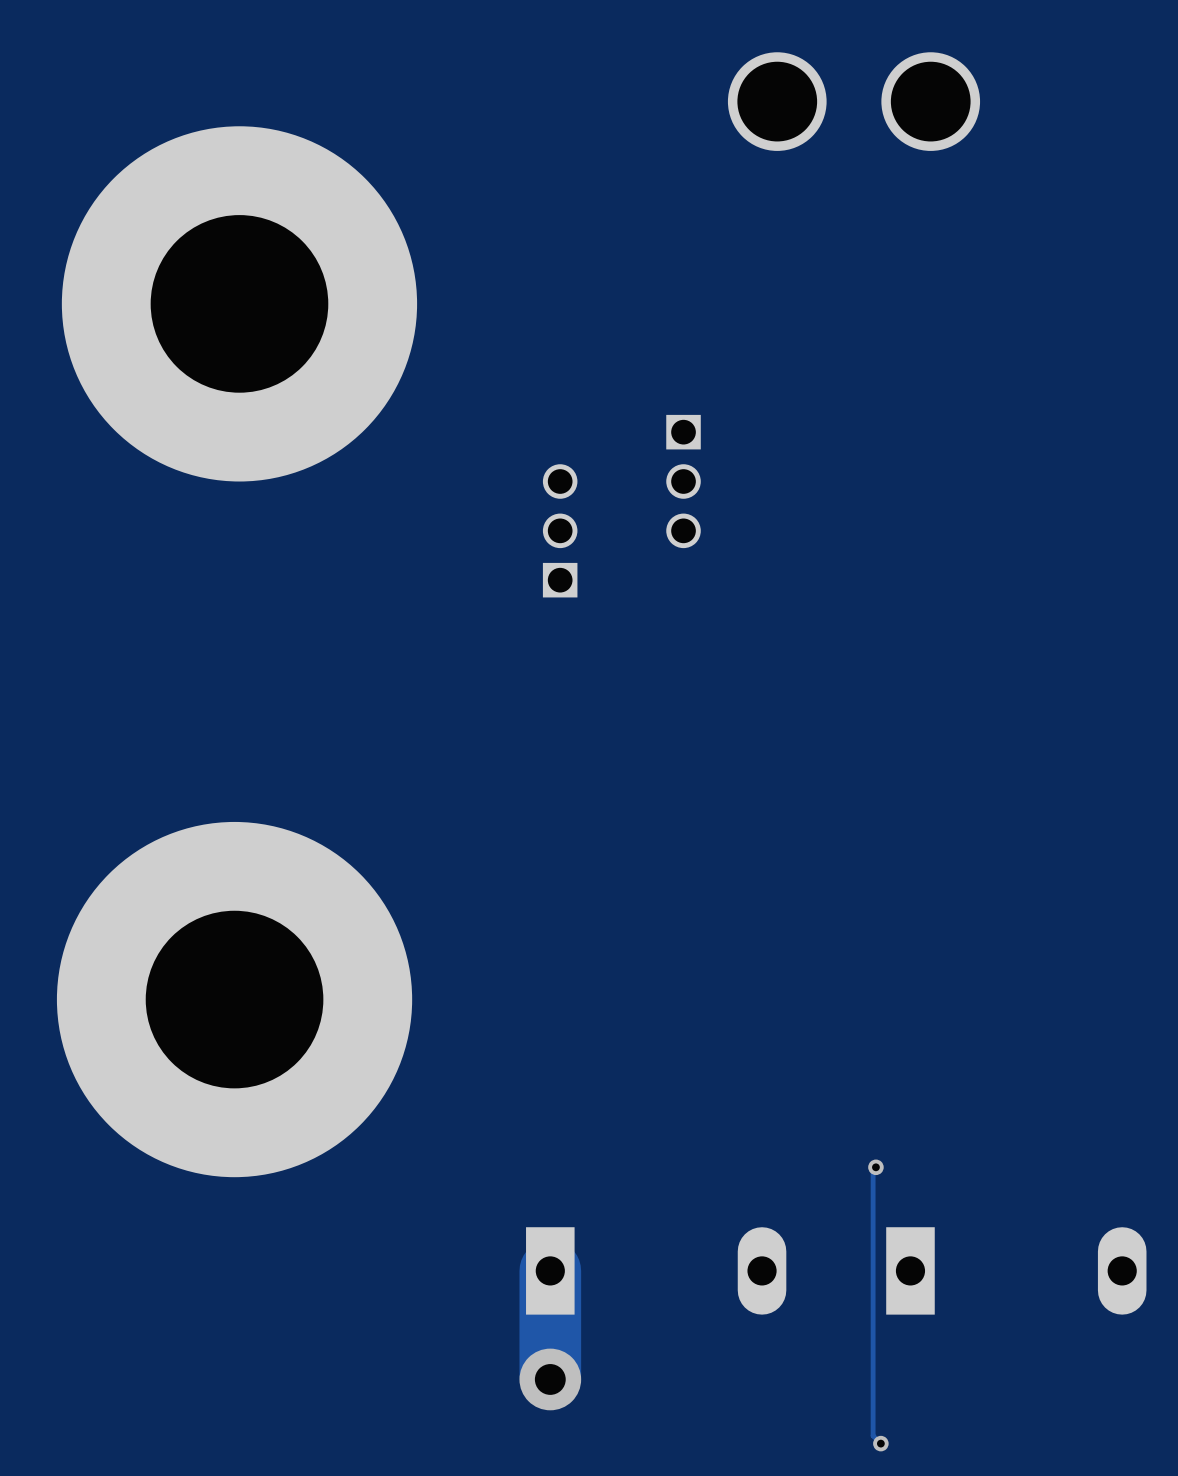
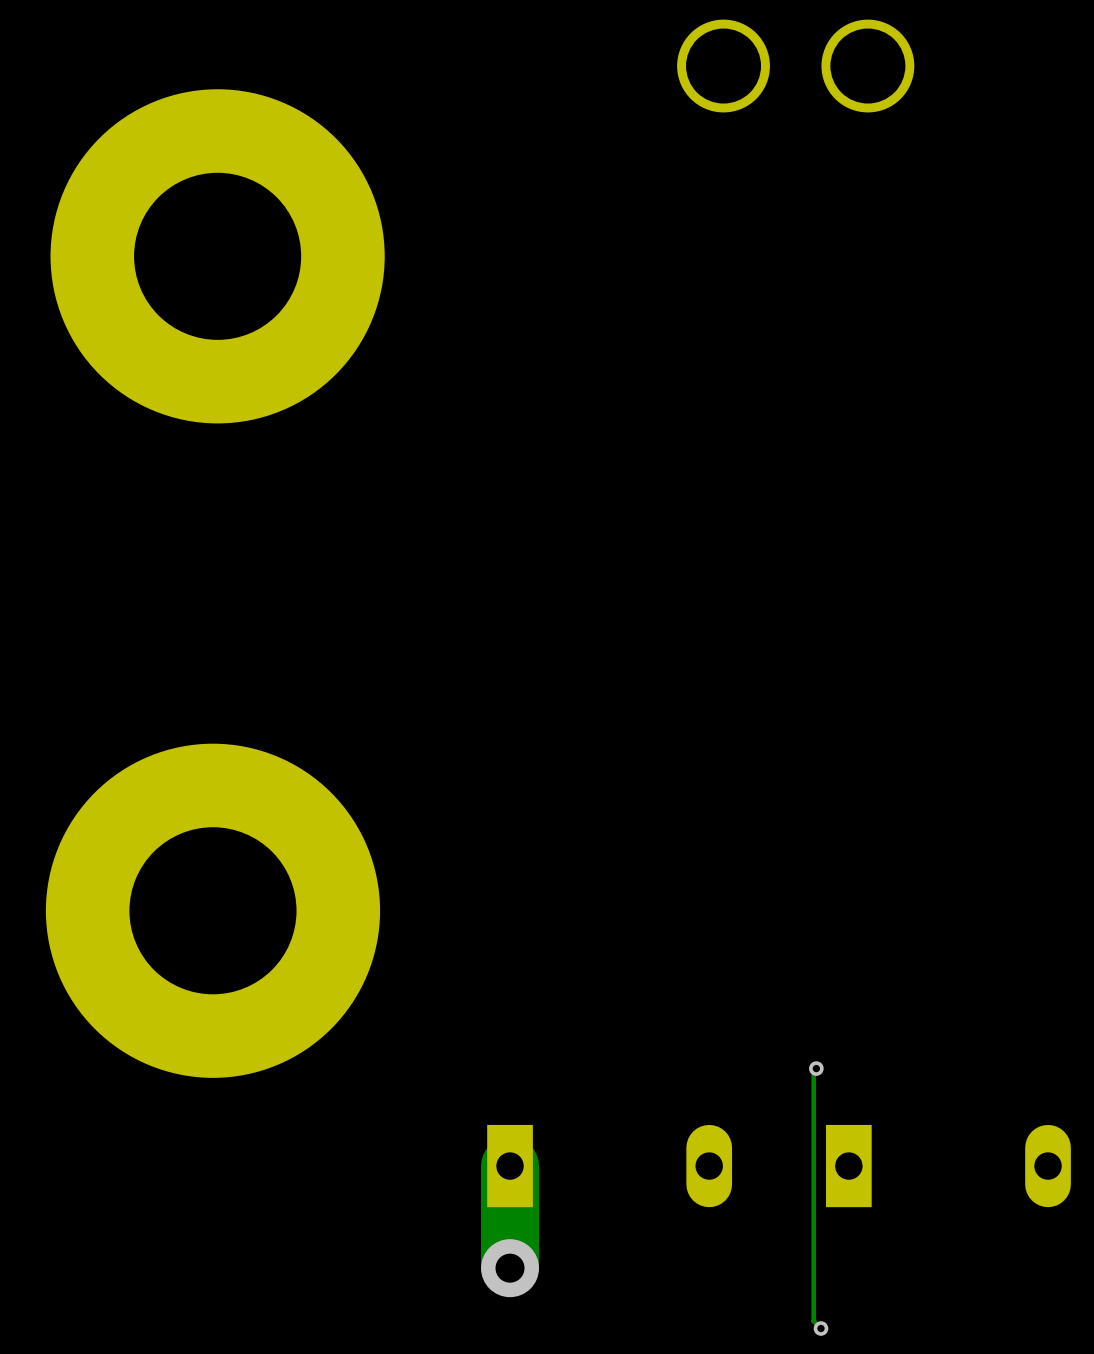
part: (683, 481) -> none
part: (560, 530) -> none

